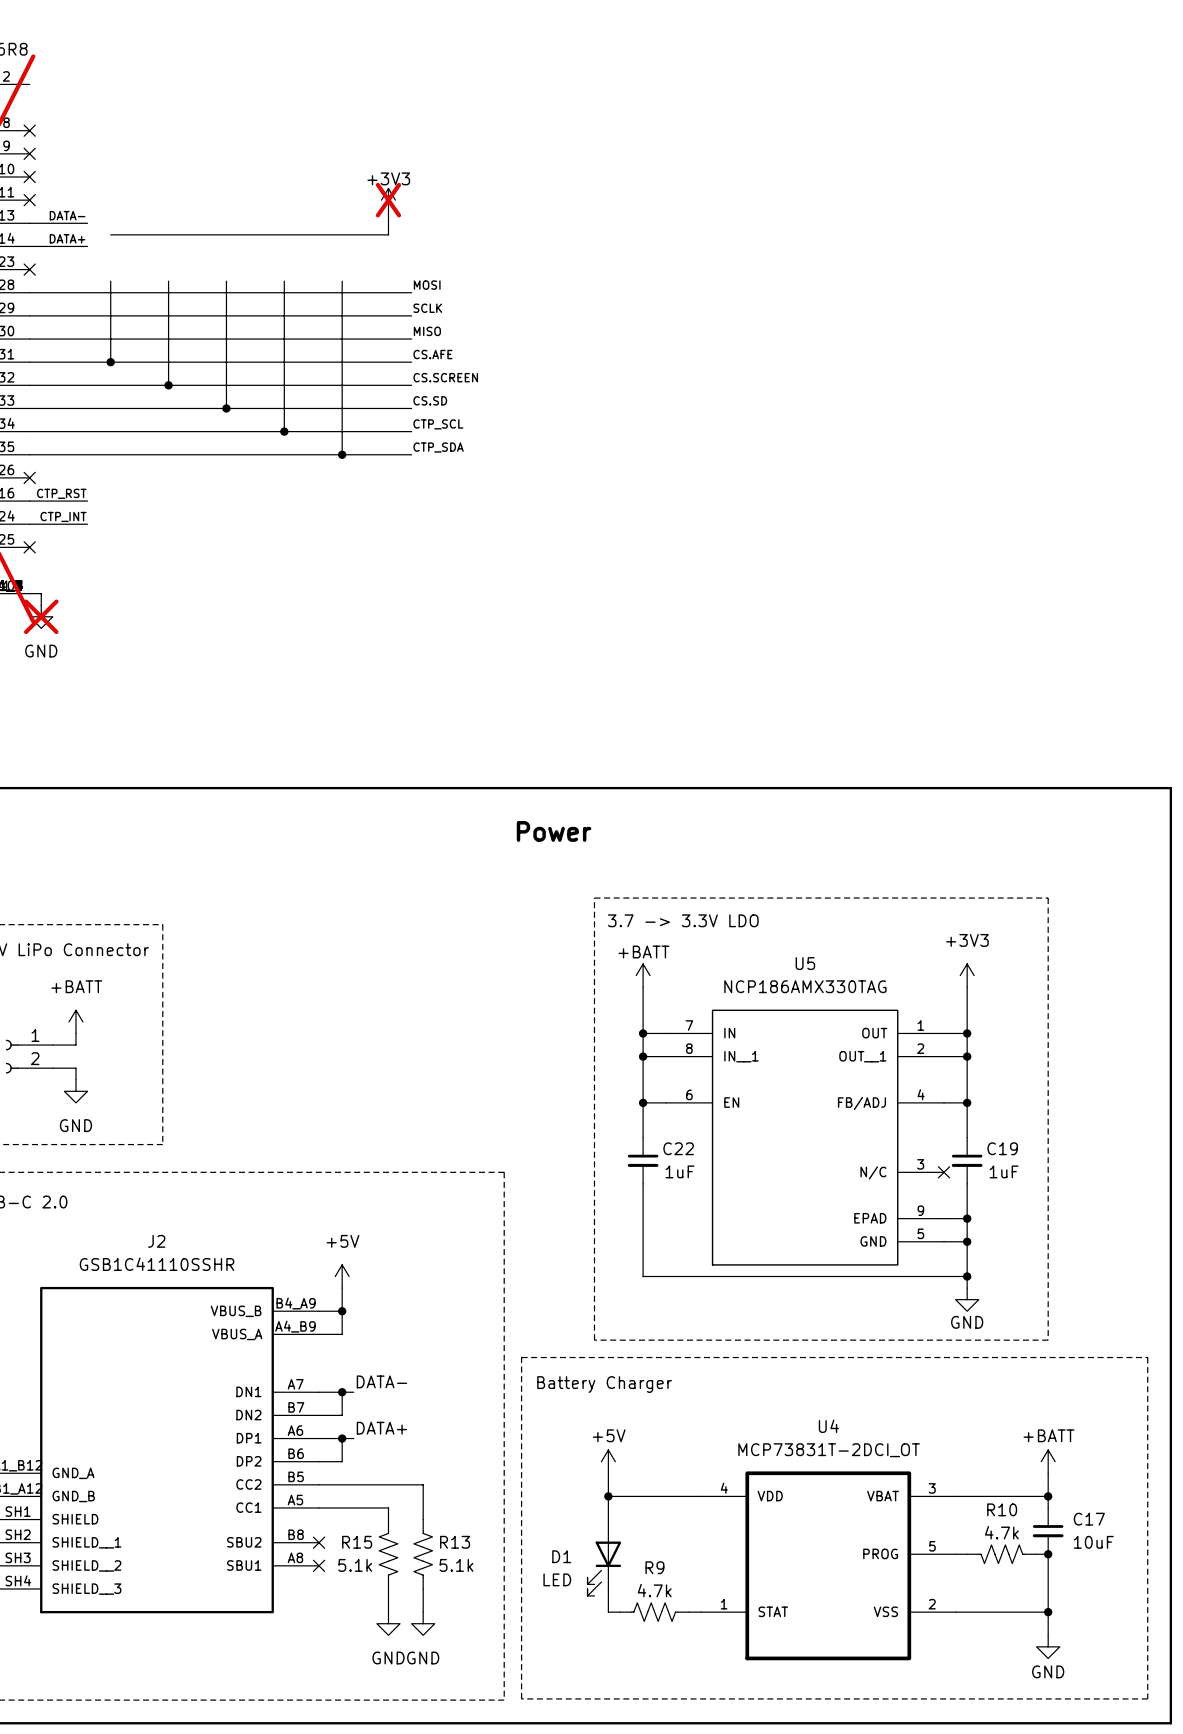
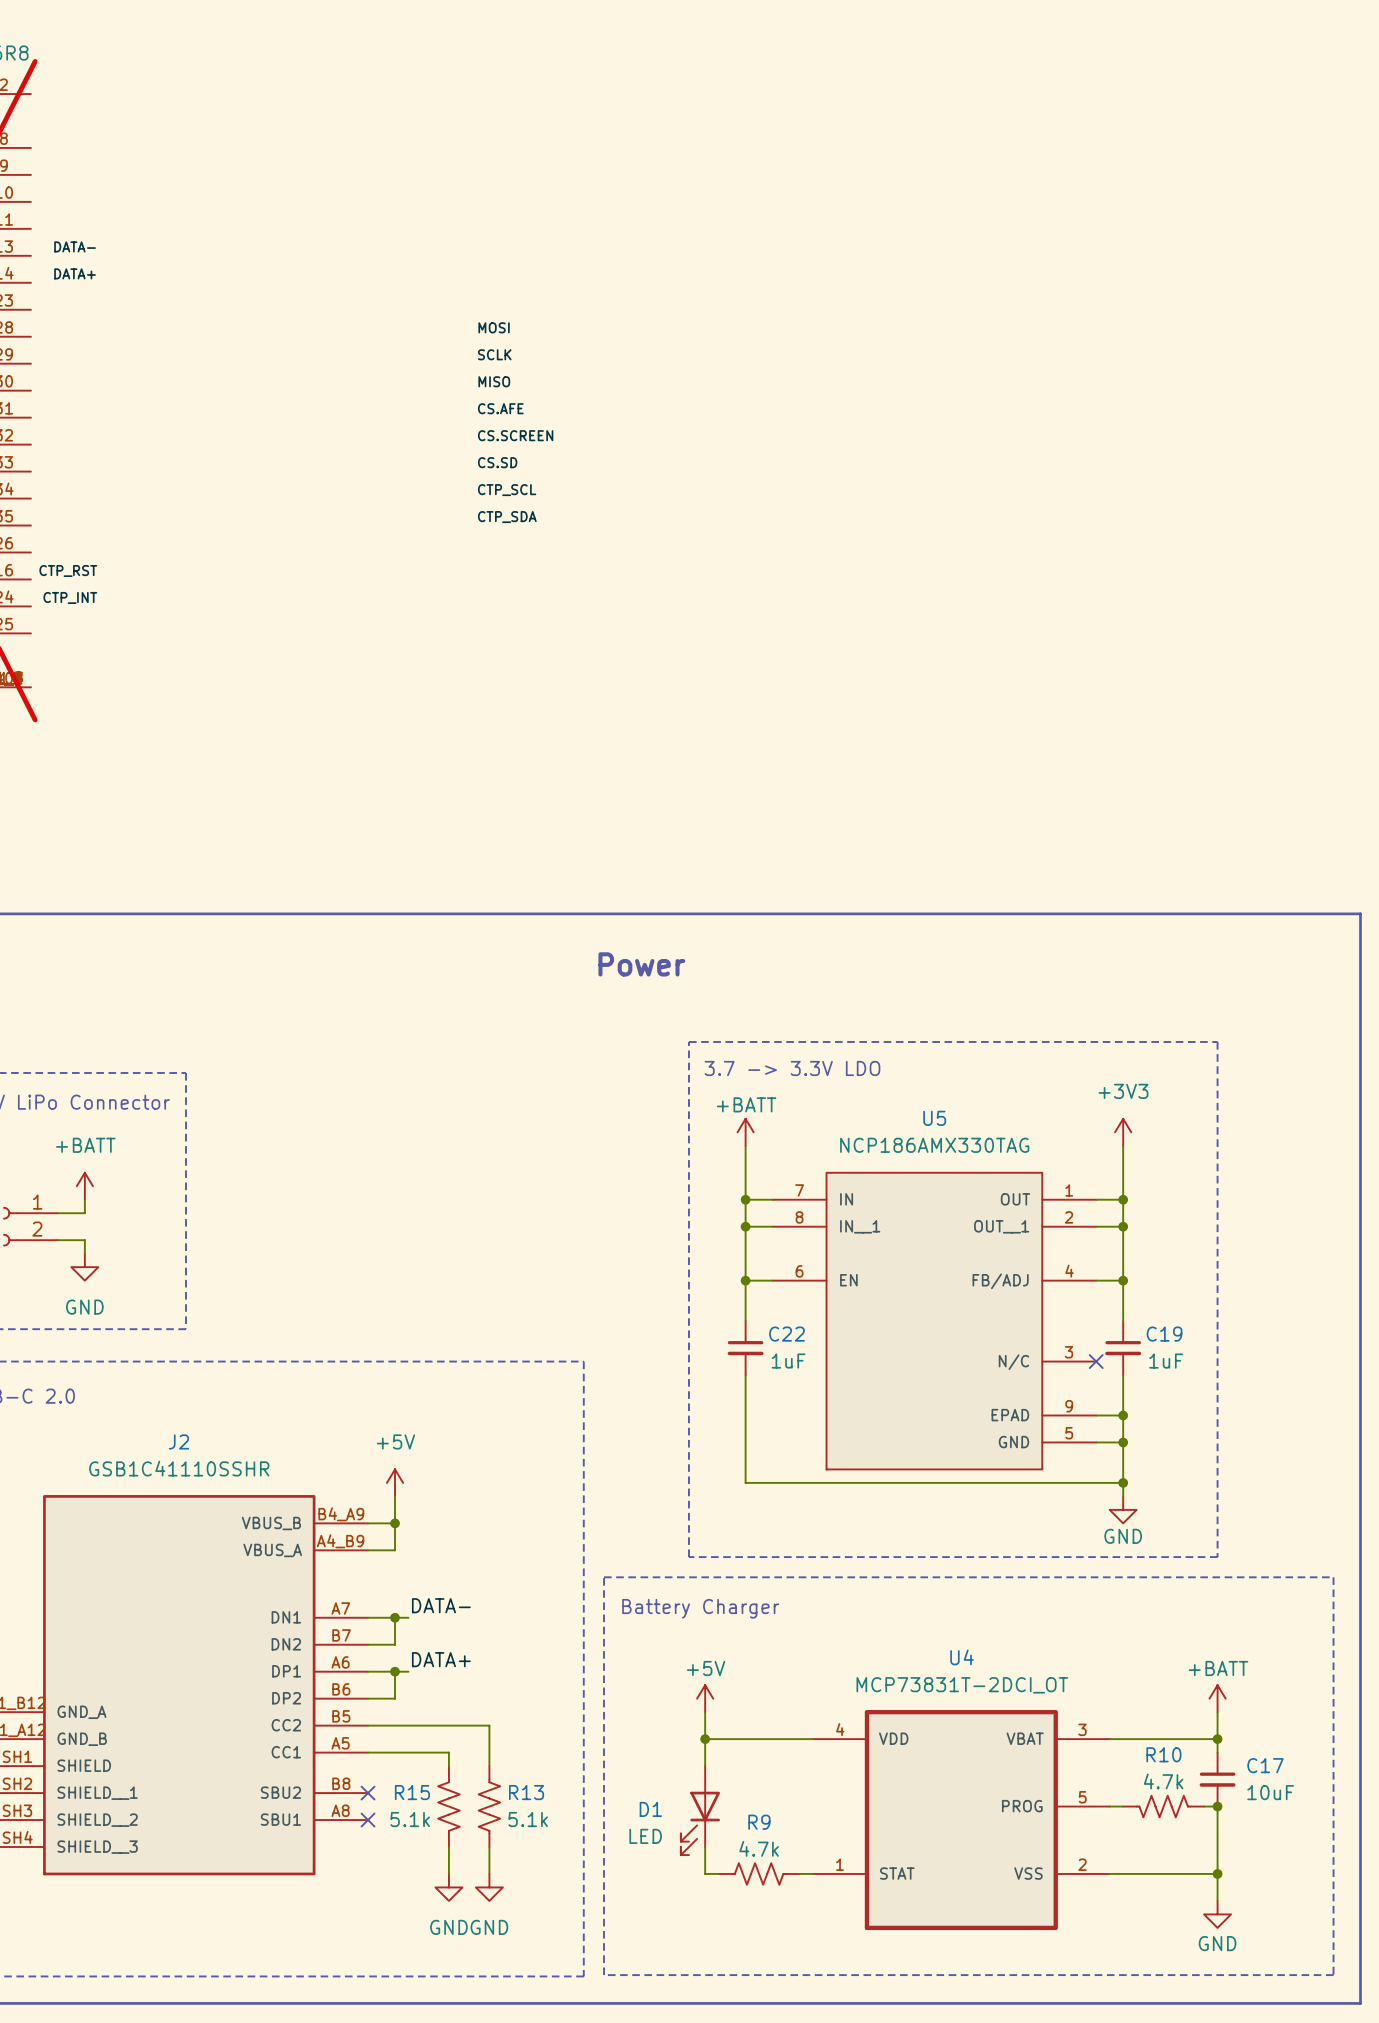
no-connect mark: (29, 130) -> none
no-connect mark: (29, 153) -> none
no-connect mark: (29, 176) -> none
no-connect mark: (29, 200) -> none
power symbol: +3V3 (388, 200) -> none
wire: (388, 211) (388, 234) (110, 234) -> none
wire: (29, 223) (87, 223) -> none
wire: (29, 246) (87, 246) -> none
no-connect mark: (29, 269) -> none
wire: (110, 281) (110, 362) -> none
wire: (168, 281) (168, 385) -> none
wire: (226, 281) (226, 408) -> none
wire: (284, 281) (284, 431) -> none
wire: (342, 281) (342, 454) -> none
wire: (29, 292) (411, 292) -> none
wire: (29, 315) (411, 315) -> none
wire: (29, 339) (411, 339) -> none
wire: (29, 362) (411, 362) -> none
junction: (110, 362) -> none
wire: (29, 385) (411, 385) -> none
junction: (168, 385) -> none
wire: (29, 408) (411, 408) -> none
junction: (226, 408) -> none
wire: (29, 431) (411, 431) -> none
junction: (284, 431) -> none
wire: (29, 454) (411, 454) -> none
junction: (342, 454) -> none
no-connect mark: (29, 477) -> none
wire: (29, 501) (87, 501) -> none
wire: (29, 524) (87, 524) -> none
no-connect mark: (29, 547) -> none
wire: (29, 593) (41, 593) (41, 605) -> none
power symbol: GND (41, 616) -> none

